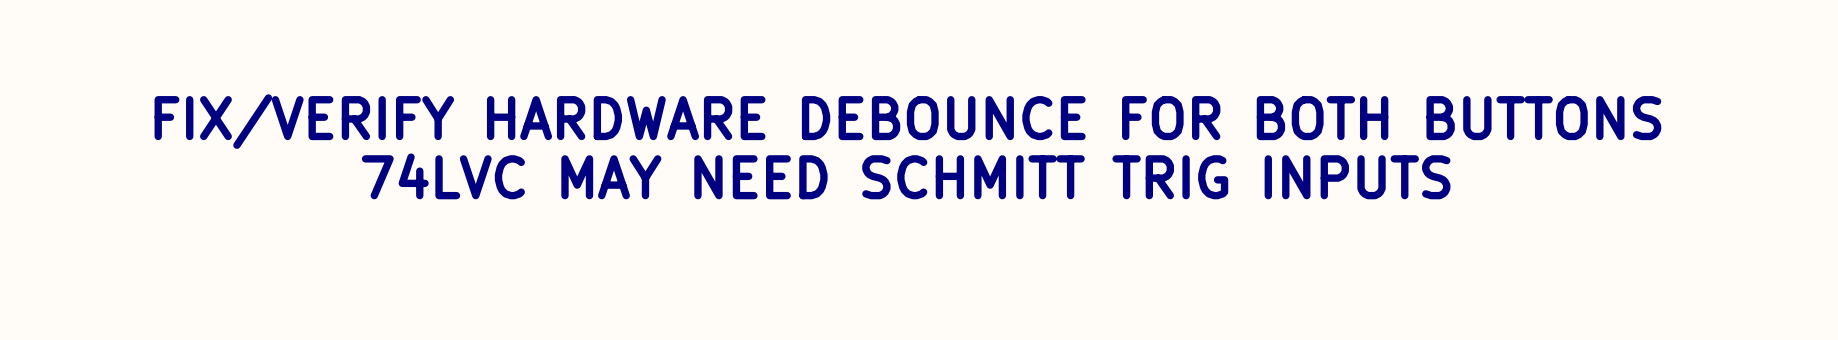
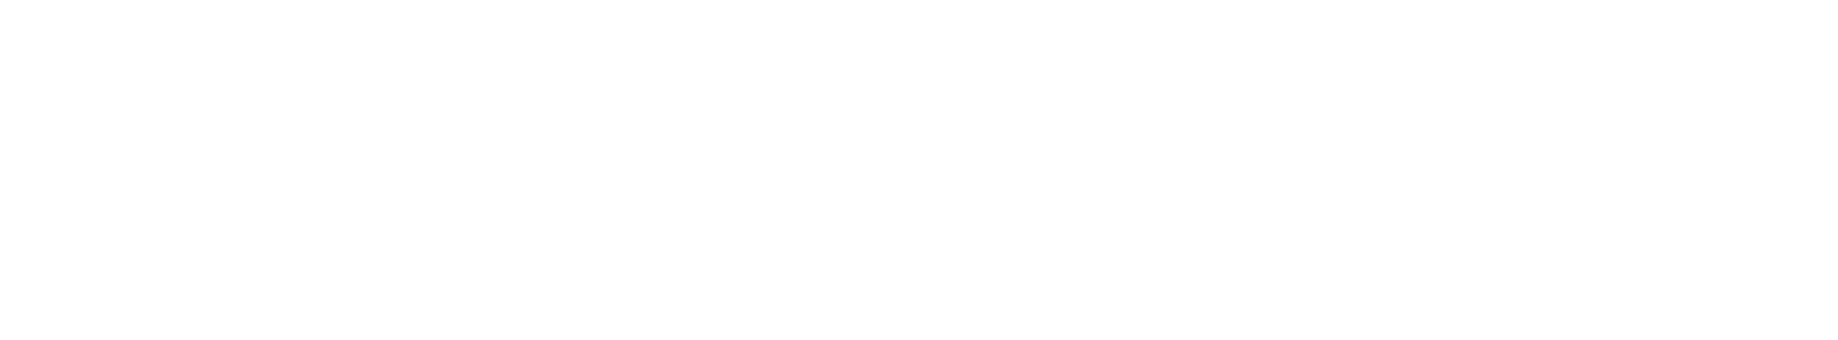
text: FIX/VERIFY HARDWARE DEBOUNCE FOR BOTH BUTTONS (907, 121) -> none
text: 74LVC MAY NEED SCHMITT TRIG INPUTS (906, 176) -> none

